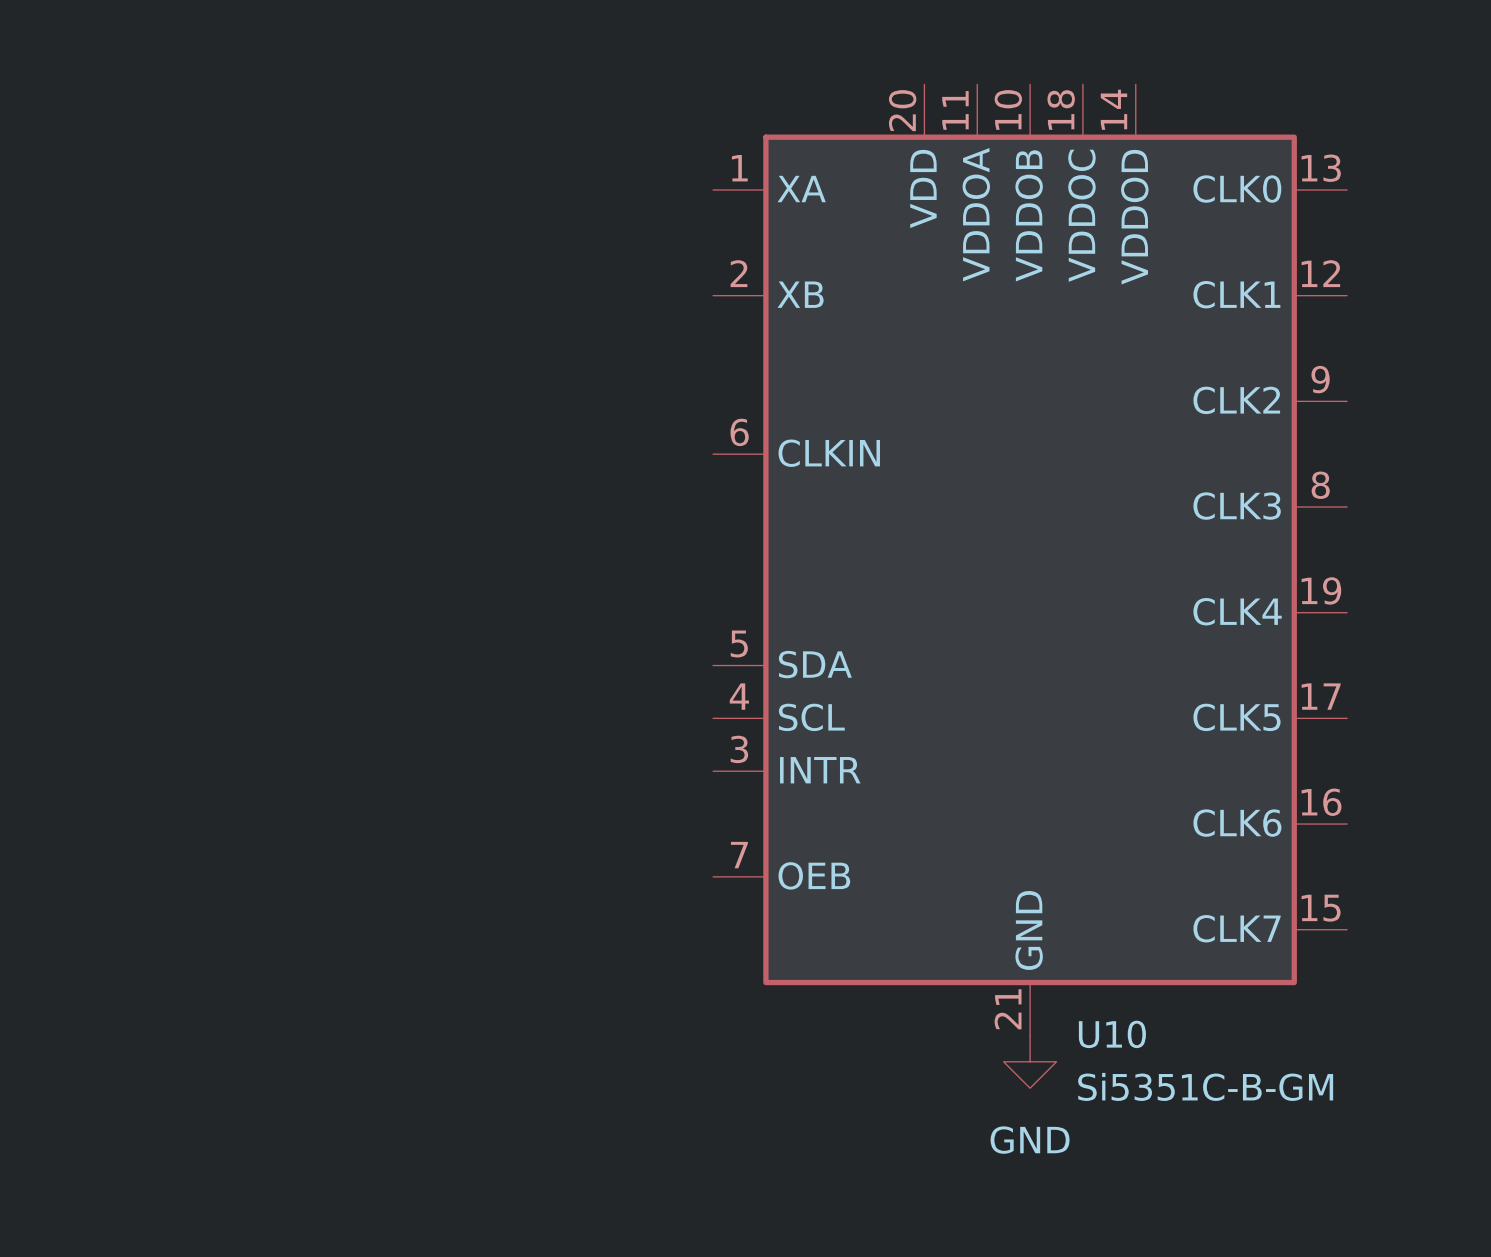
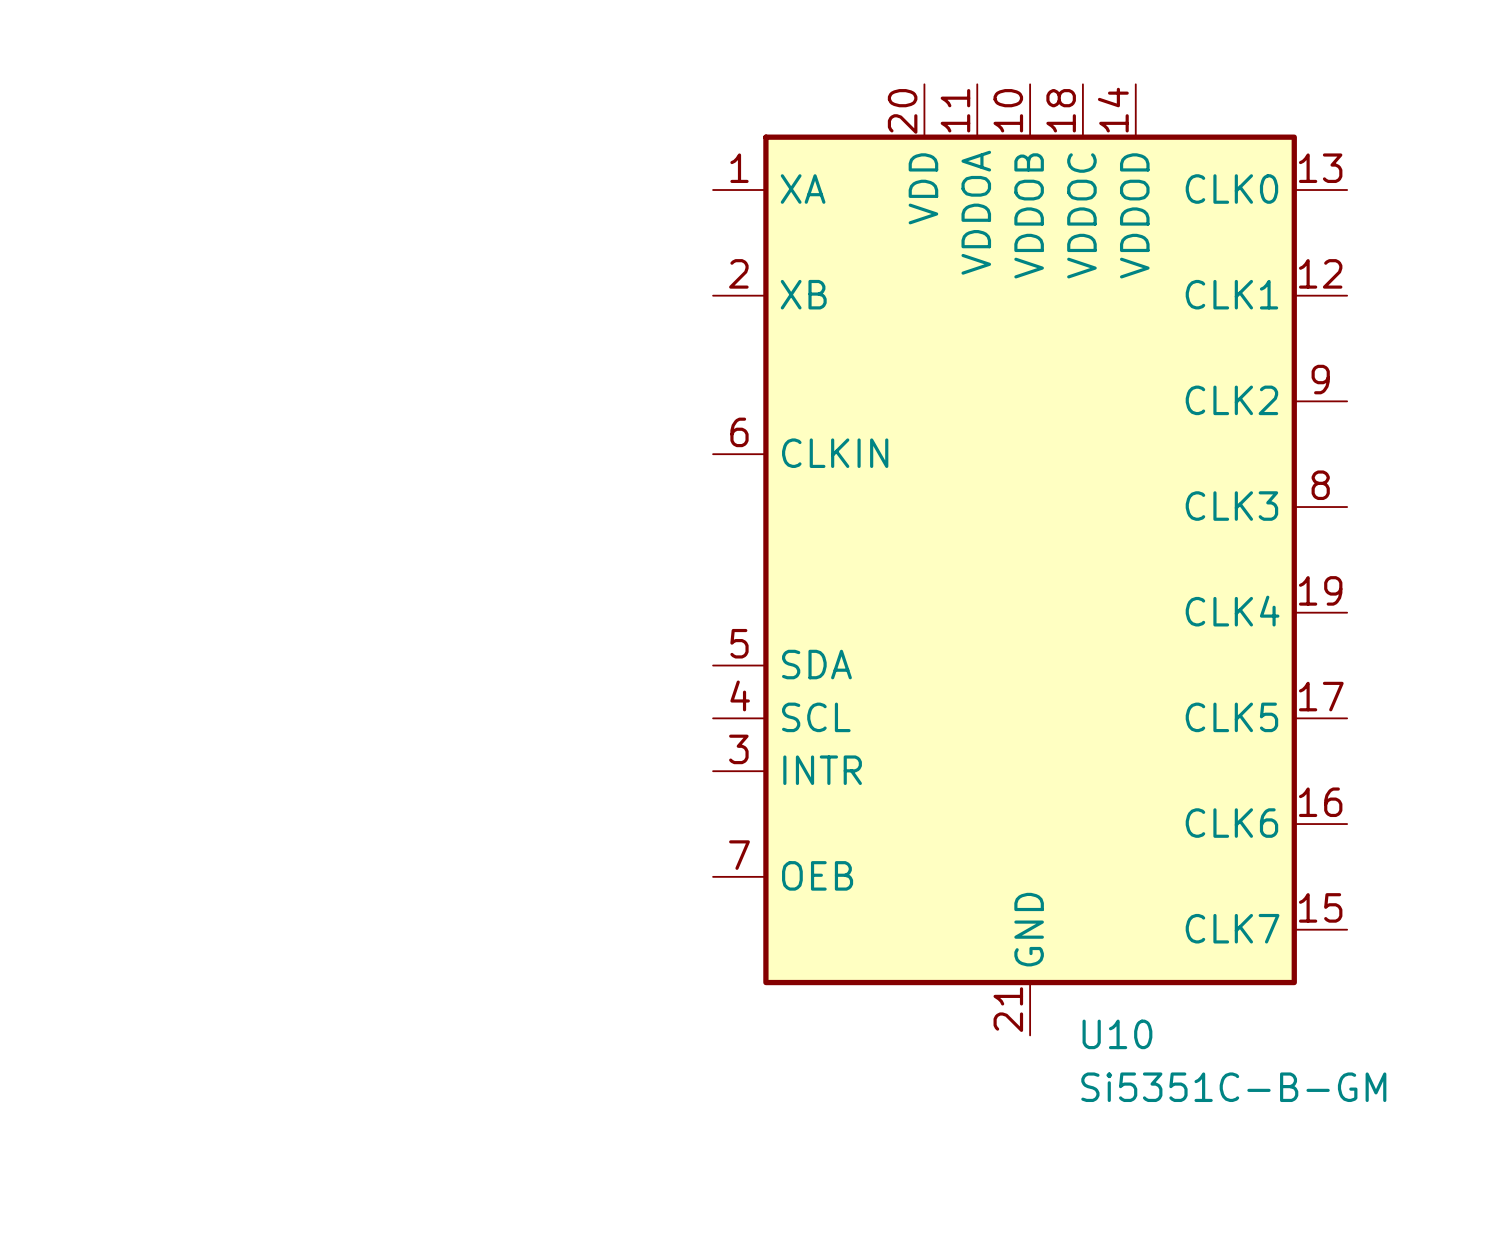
power symbol: GND (1030, 1061) -> none

